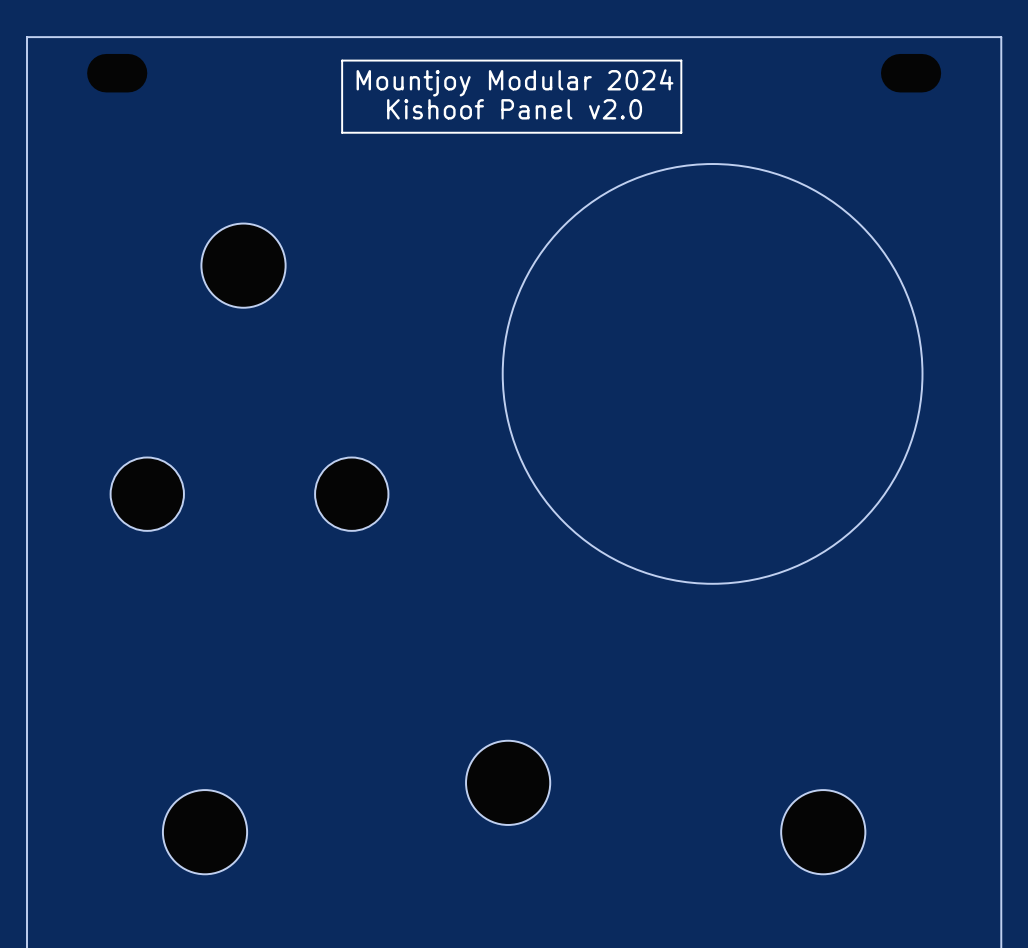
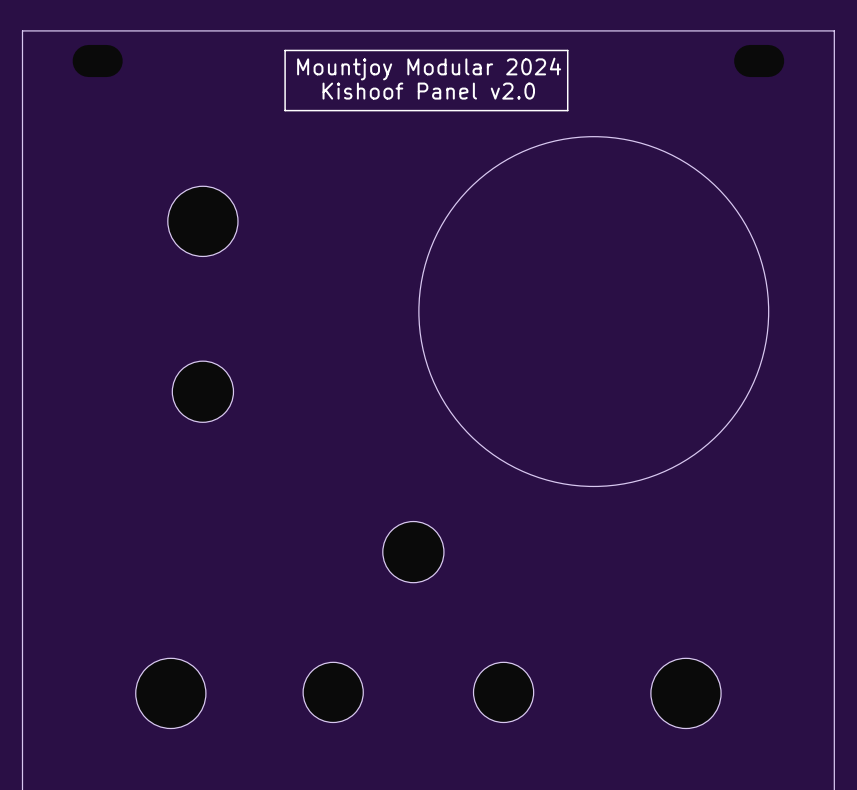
part: none -> (202, 391)
part: (147, 494) -> none
part: (351, 494) -> none
part: none -> (413, 552)
part: (508, 782) -> none
part: none -> (333, 692)
part: none -> (503, 692)

